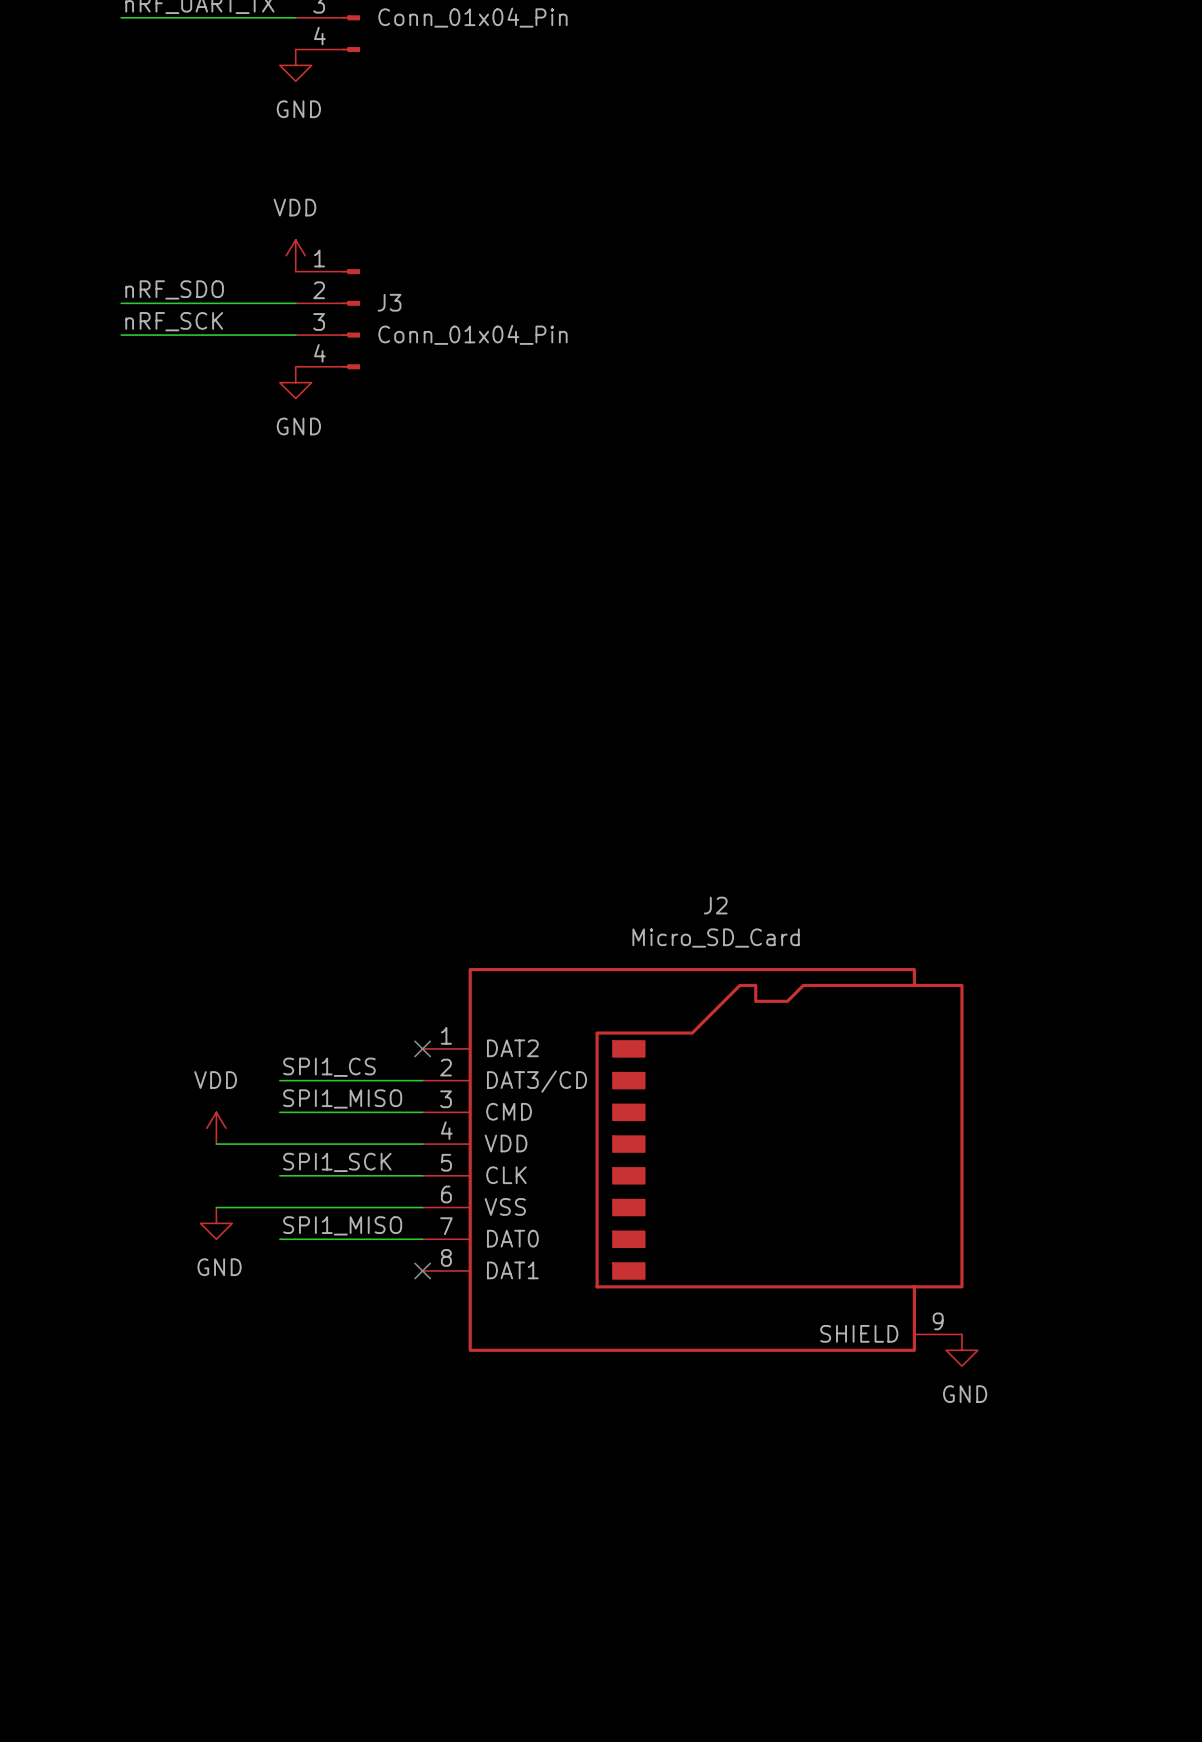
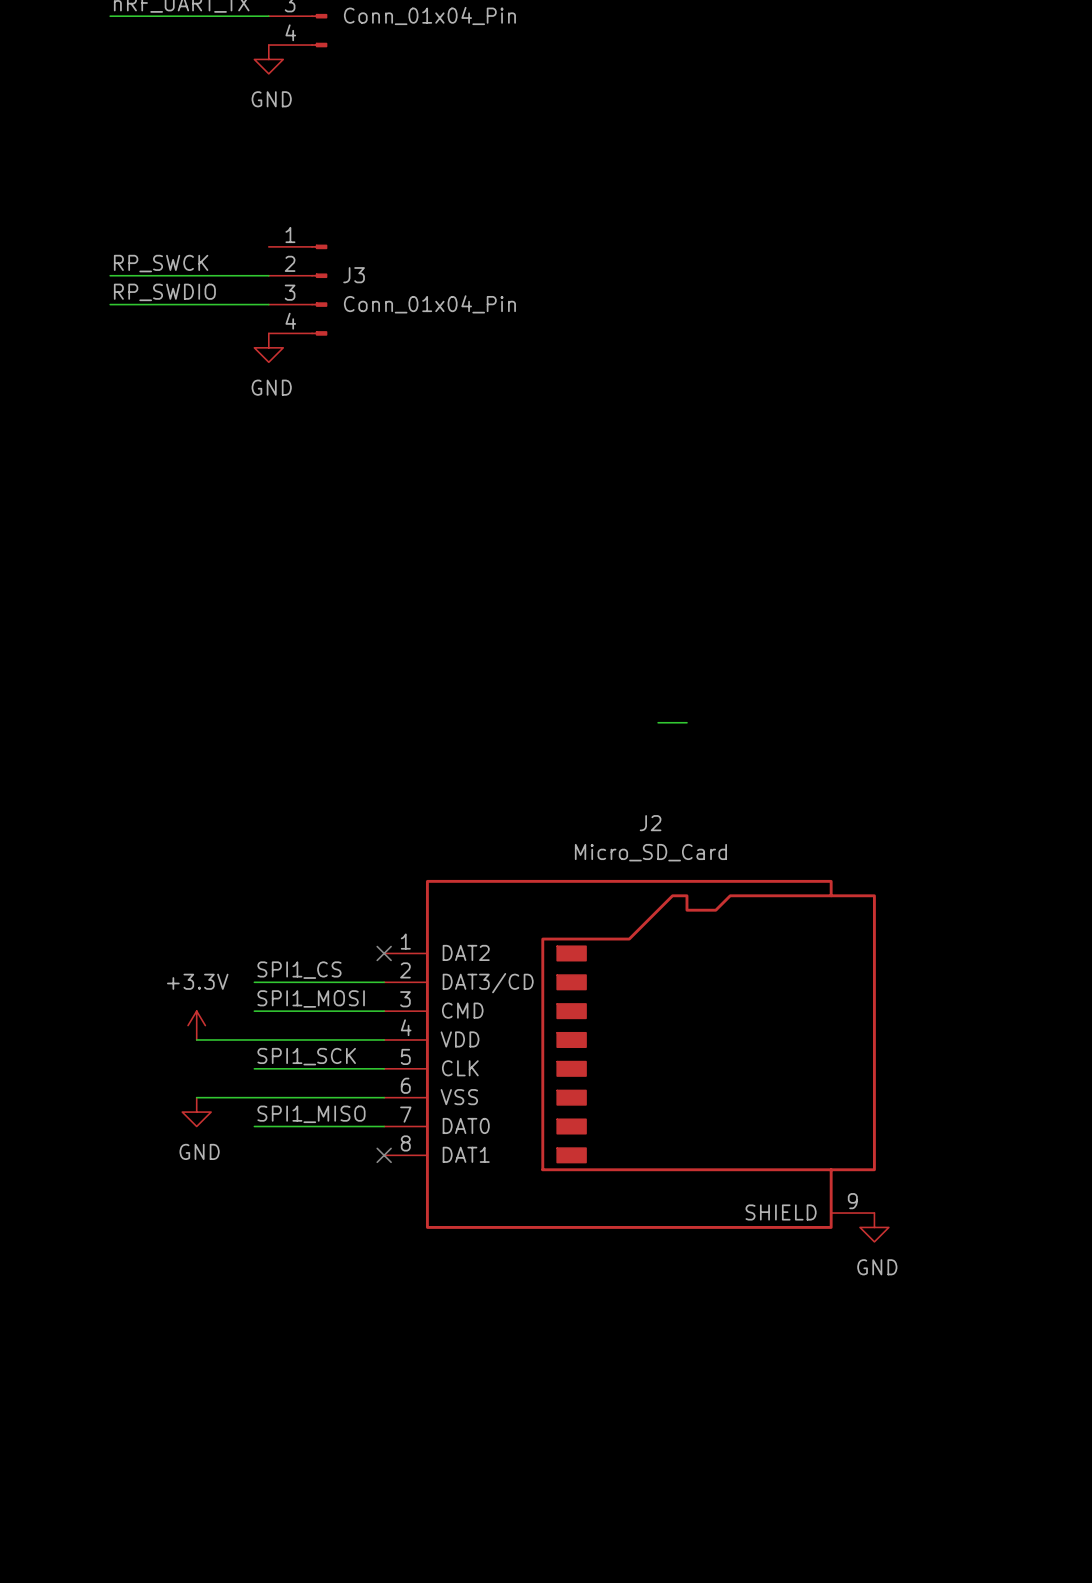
power symbol: VDD (295, 255) -> none
label: nRF_SDO (174, 289) -> RP_SWCK (161, 263)
label: nRF_SCK (174, 321) -> RP_SWDIO (164, 292)
wire: none -> (658, 722) (686, 722)
label: SPI1_MISO (342, 1098) -> SPI1_MOSI (311, 998)
power symbol: VDD (216, 1128) -> +3.3V (196, 1025)

